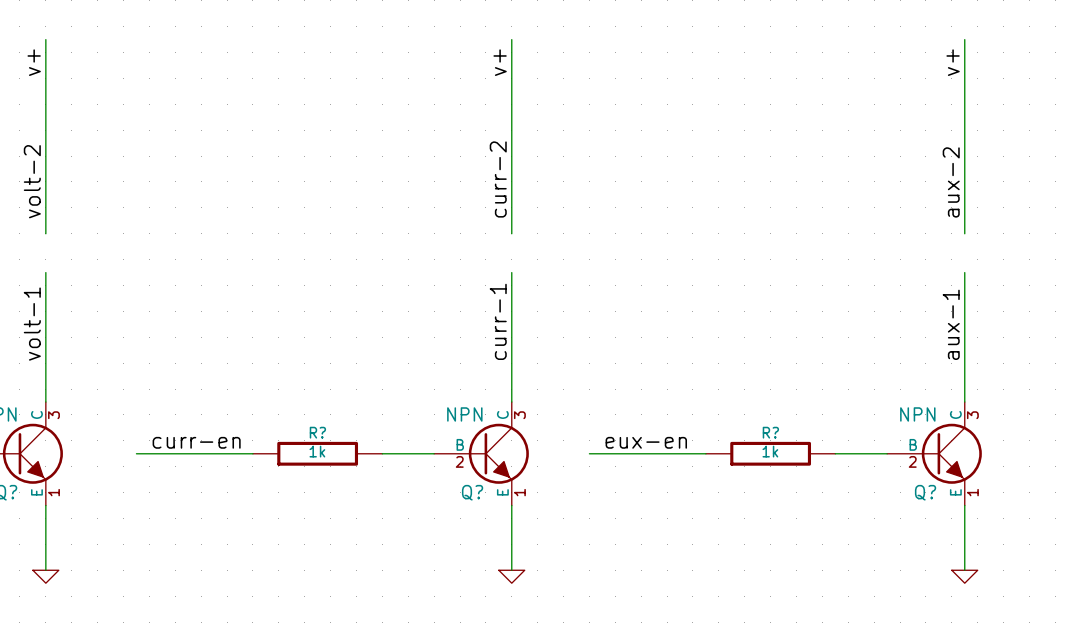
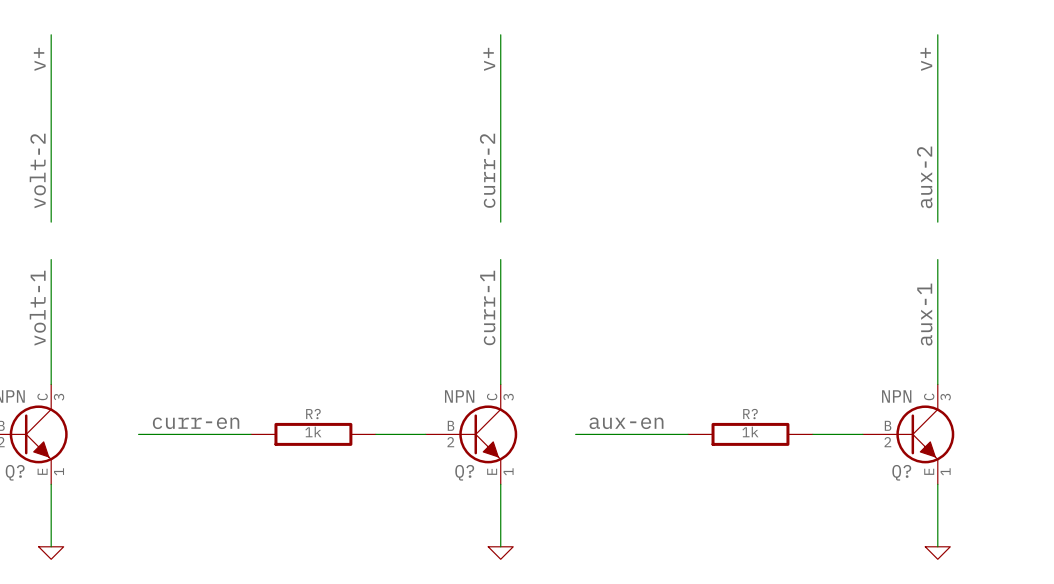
label: eux-en (646, 442) -> aux-en (626, 423)

